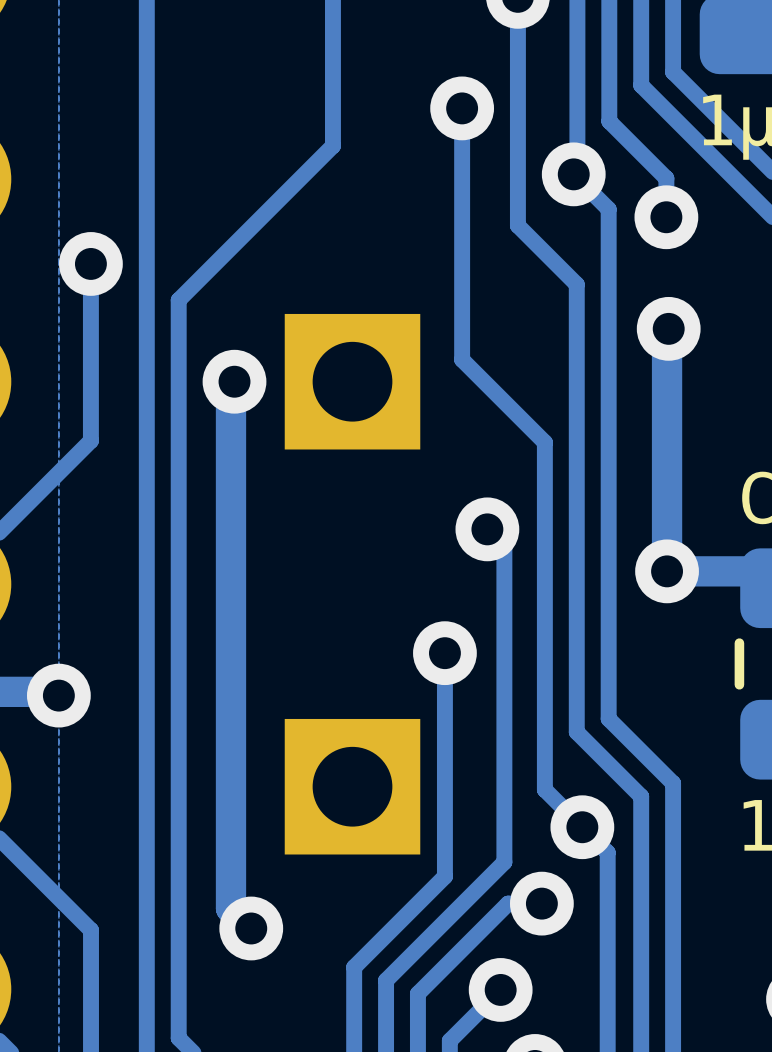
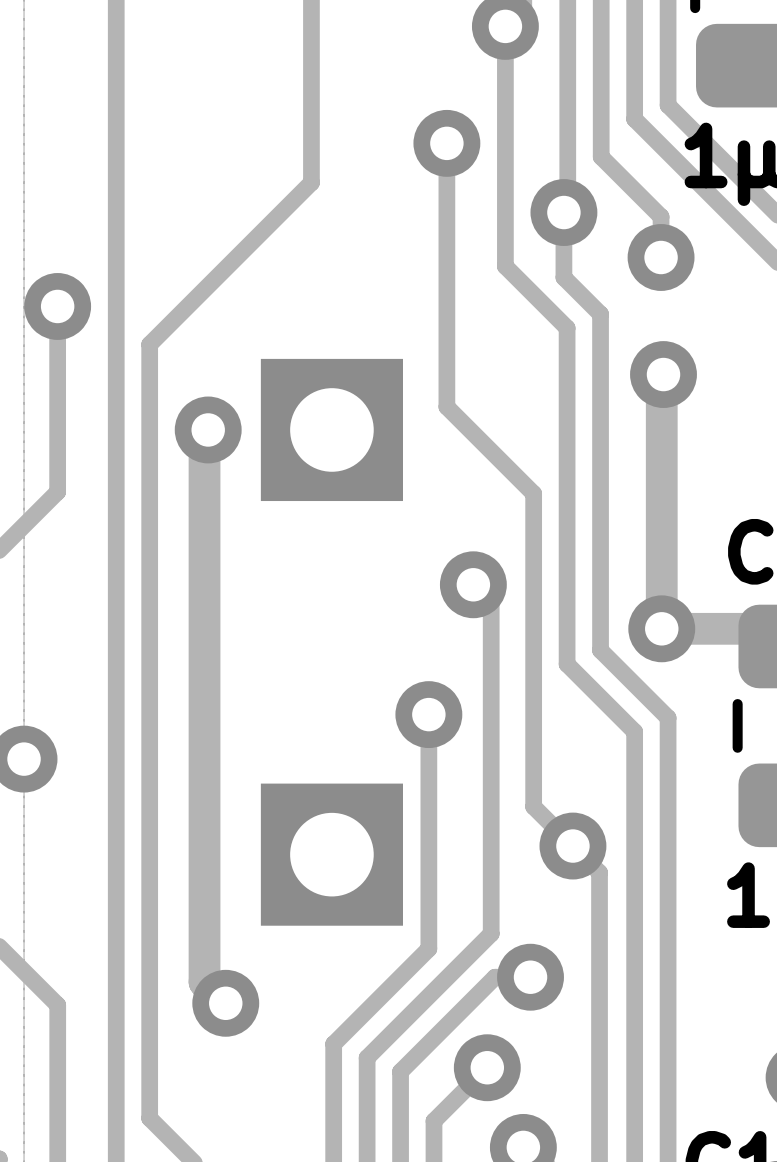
track: (573, 174) (608, 209) (608, 271) -> (563, 212) (563, 277) (600, 314)
track: (608, 591) (608, 718) (673, 783) -> (600, 650) (668, 717) (668, 851)
track: (576, 605) (576, 732) (641, 796) -> (567, 664) (634, 731) (634, 864)
track: (544, 741) (544, 789) (607, 852) -> (533, 806) (599, 872) (599, 923)
via position: (582, 827) -> (572, 846)

